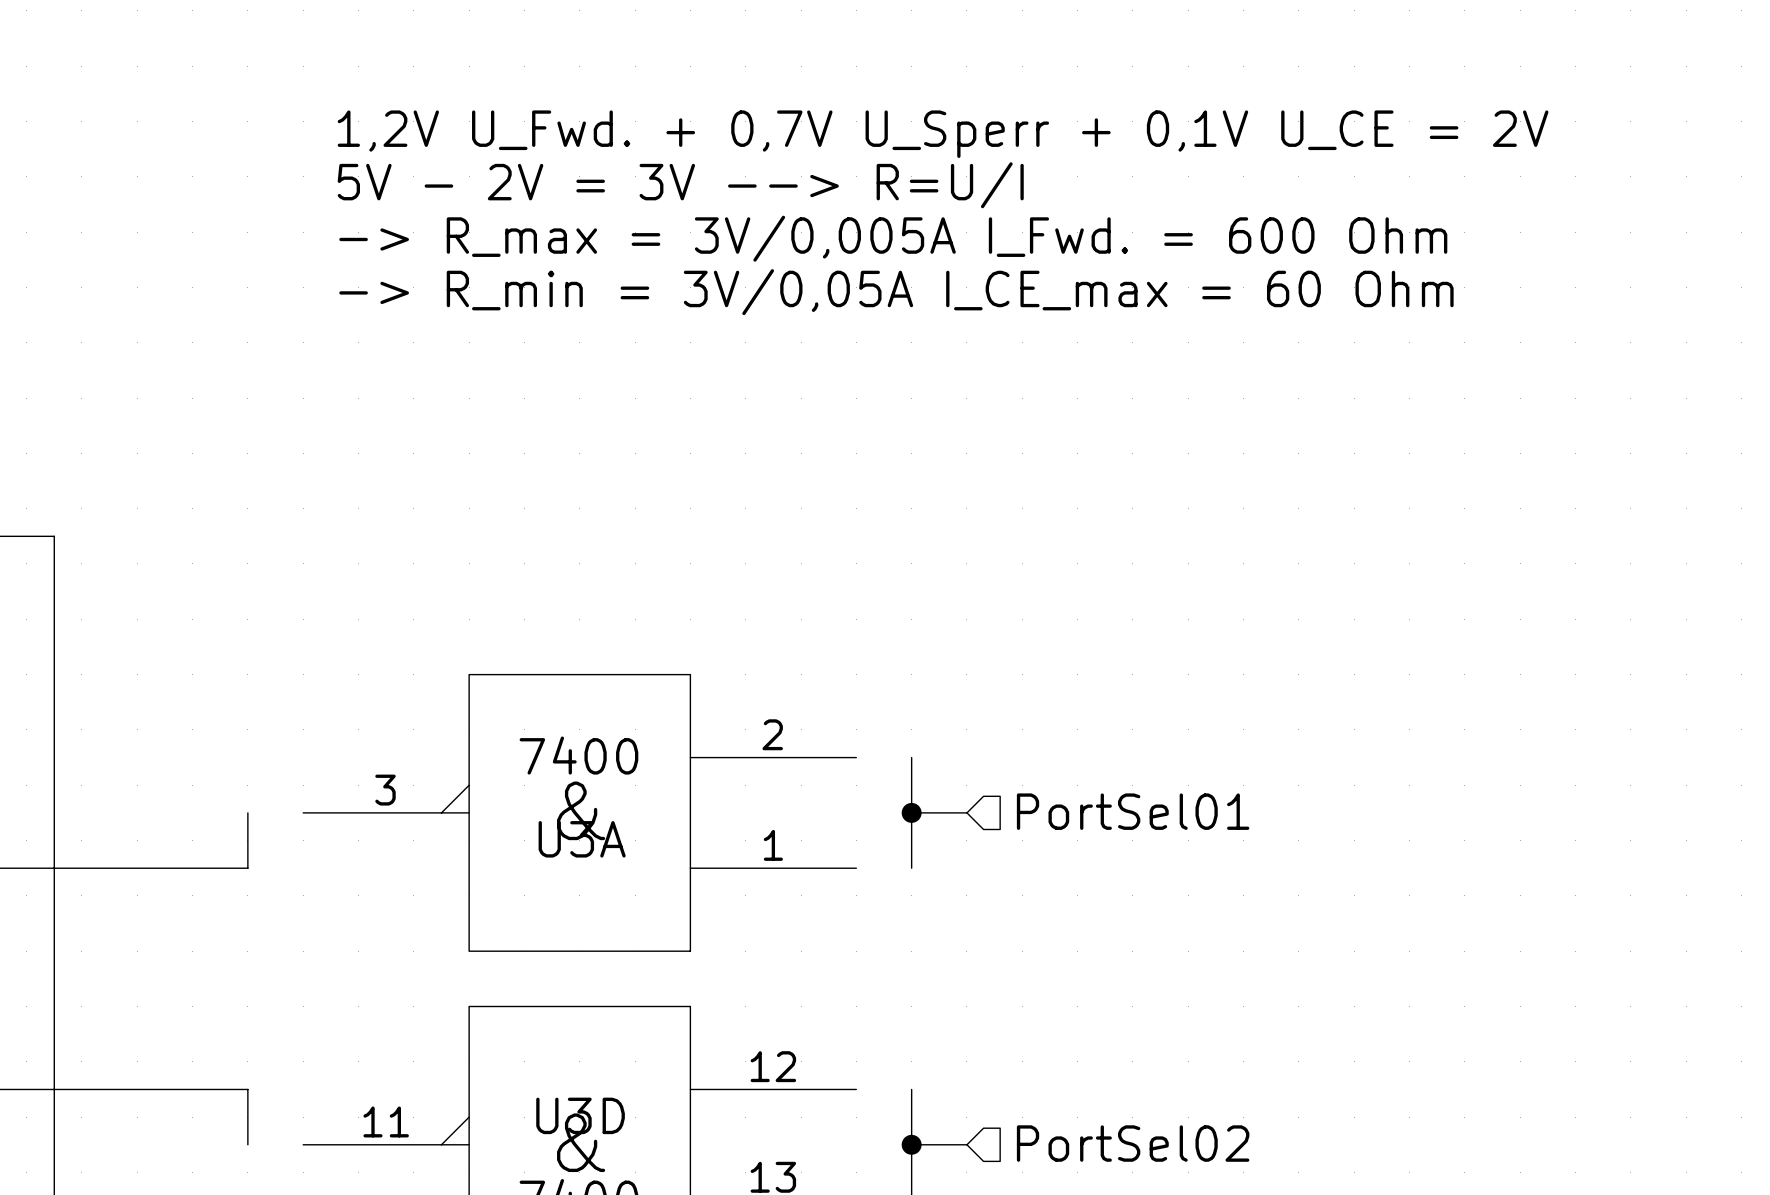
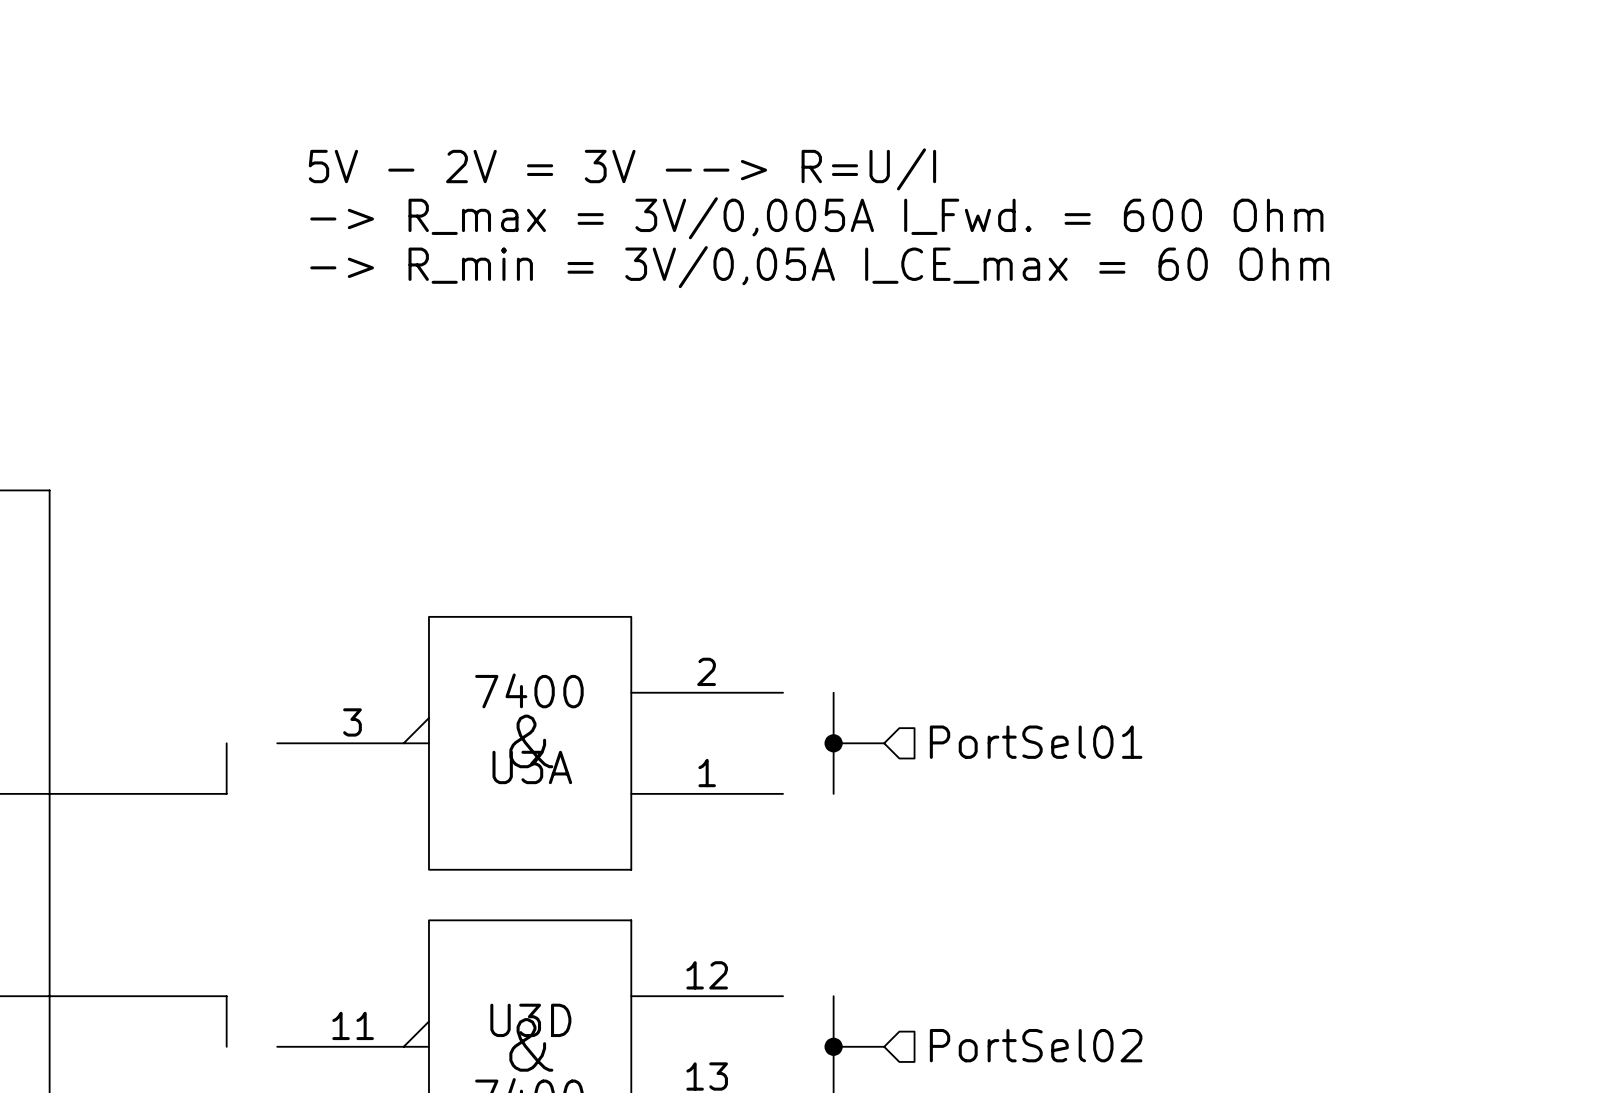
text: 1,2V U_Fwd. + 0,7V U_Sperr + 0,1V U_CE = 2V (943, 134) -> none

